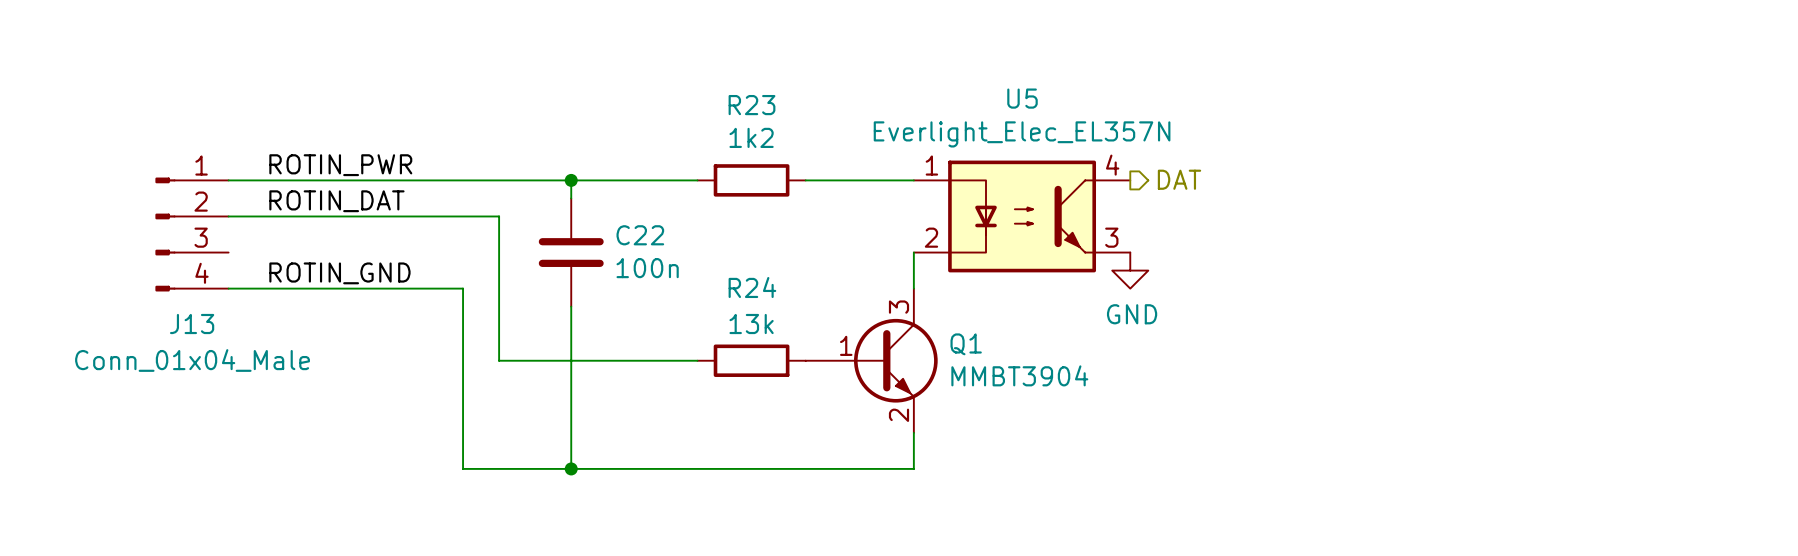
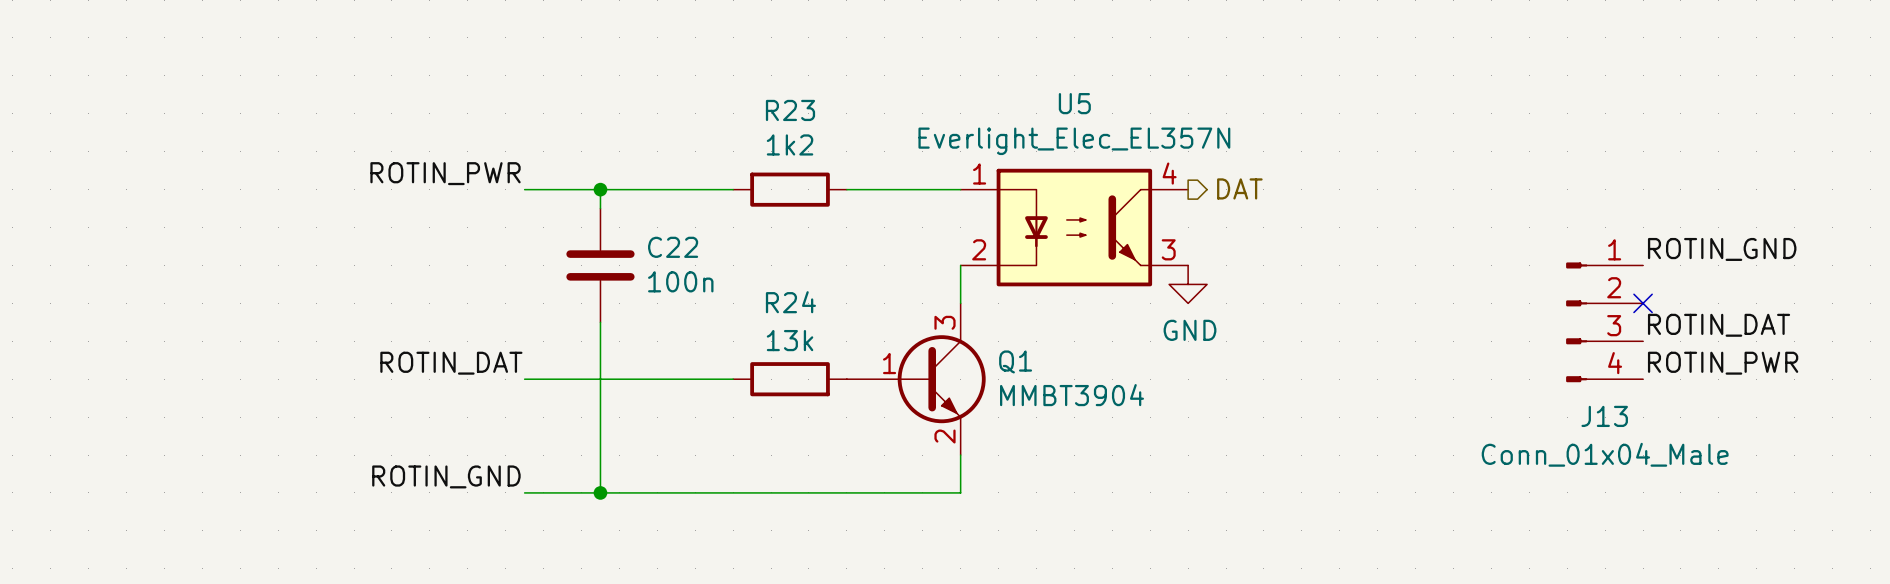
label position: ROTIN_PWR (340, 165) -> ROTIN_PWR (445, 173)
wire: (228, 180) (499, 180) -> none
label position: ROTIN_DAT (336, 201) -> ROTIN_DAT (451, 363)
wire: (228, 216) (499, 216) (499, 360) -> none
J13 position: (191, 234) -> (1604, 322)
label: none -> ROTIN_GND (1722, 249)
label position: ROTIN_GND (339, 273) -> ROTIN_GND (446, 476)
wire: (228, 288) (463, 288) (463, 468) (499, 468) -> none
no-connect mark: none -> (1643, 303)
label: none -> ROTIN_DAT (1719, 325)
label: none -> ROTIN_PWR (1723, 363)

